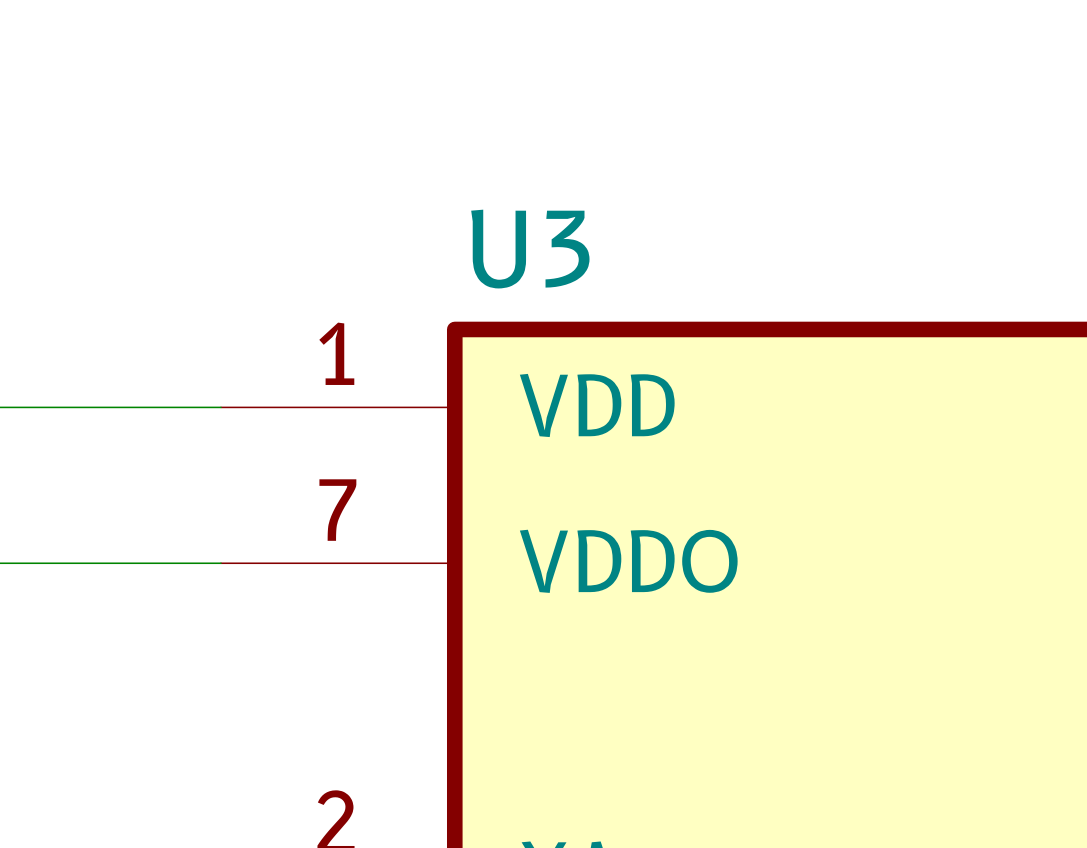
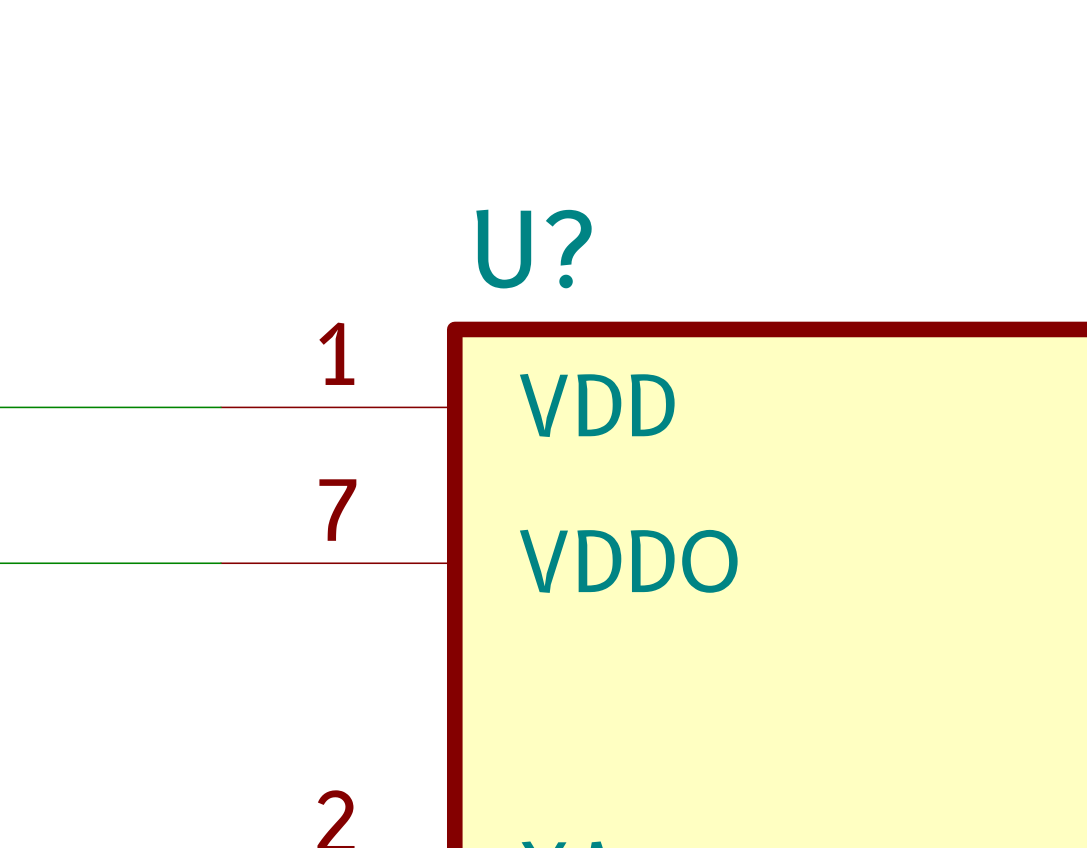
U3 name: U3 (530, 249) -> U? (533, 249)

